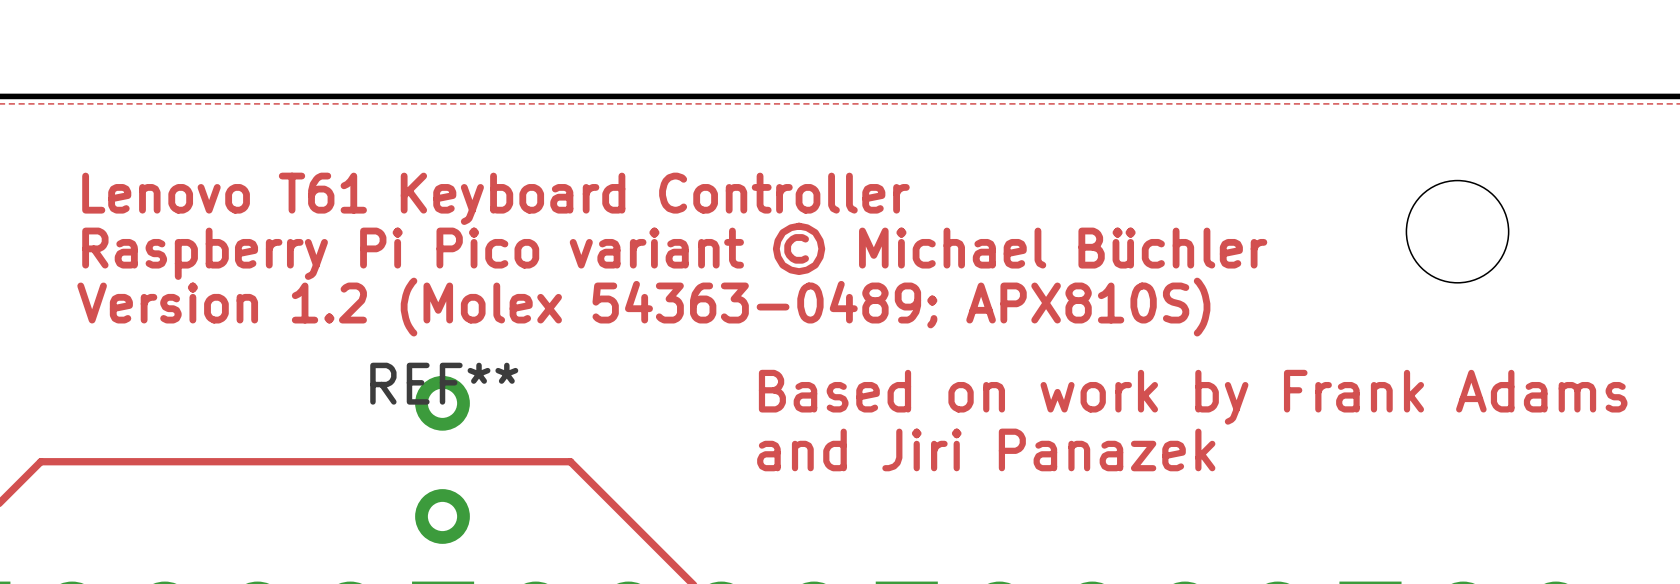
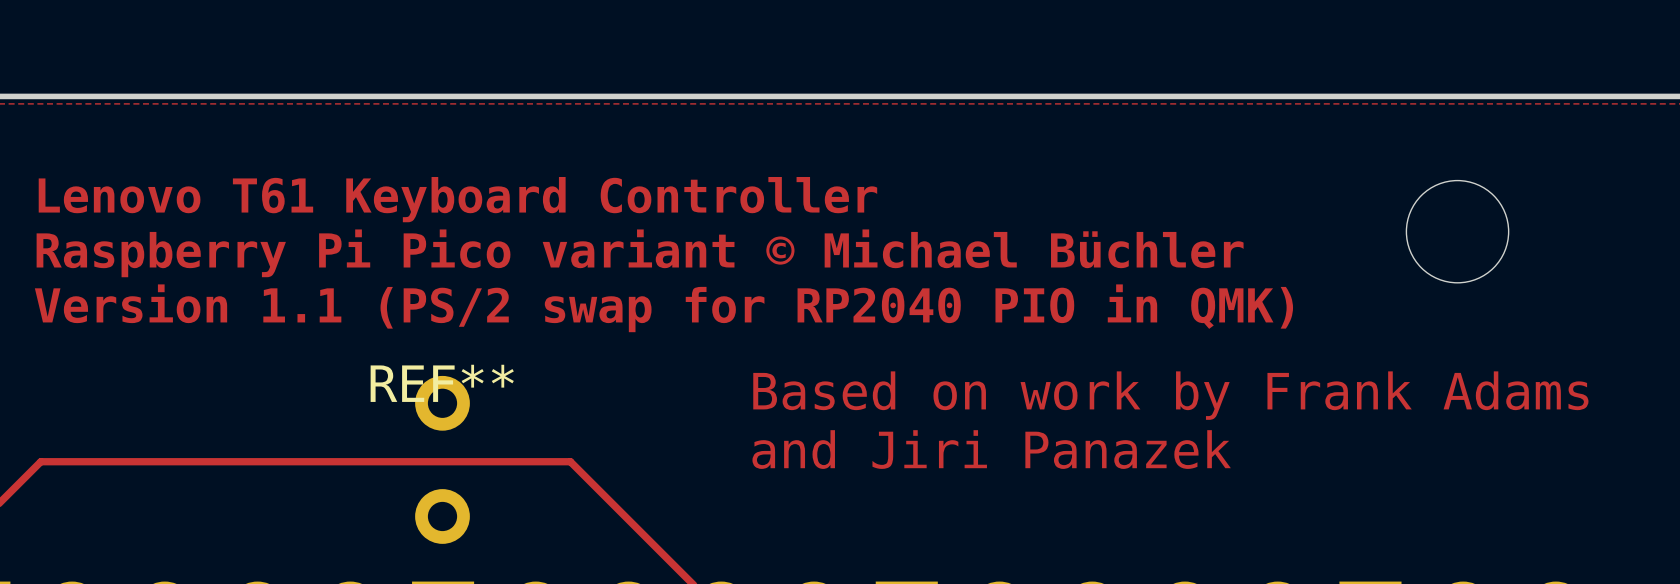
text position: Lenovo T61 Keyboard Controller (495, 198) -> Lenovo T61 Keyboard Controller (457, 199)
text position: Raspberry Pi Pico variant © Michael Büchler (674, 251) -> Raspberry Pi Pico variant © Michael Büchler (640, 253)
text: Version 1.2 (Molex 54363-0489; APX810S) (643, 307) -> none
text: none -> Version 1.1 (PS/2 swap for RP2040 PIO in QMK) (663, 308)

